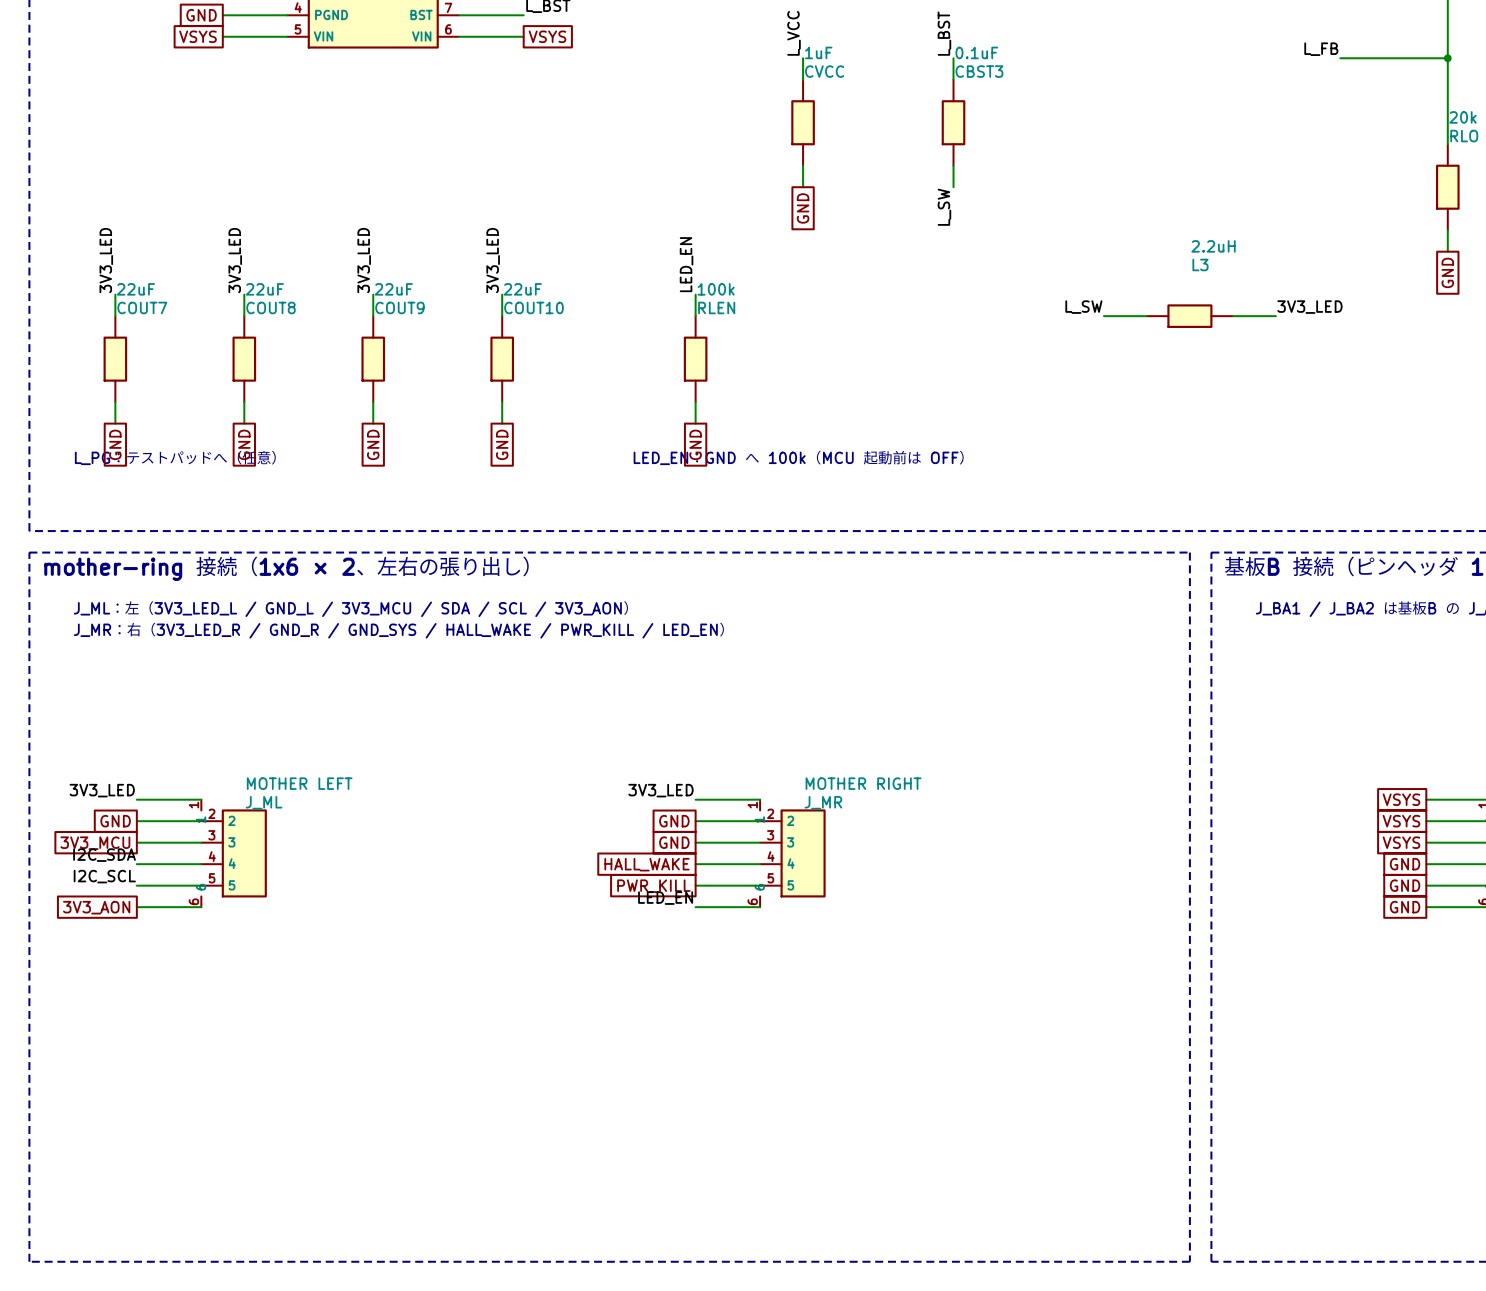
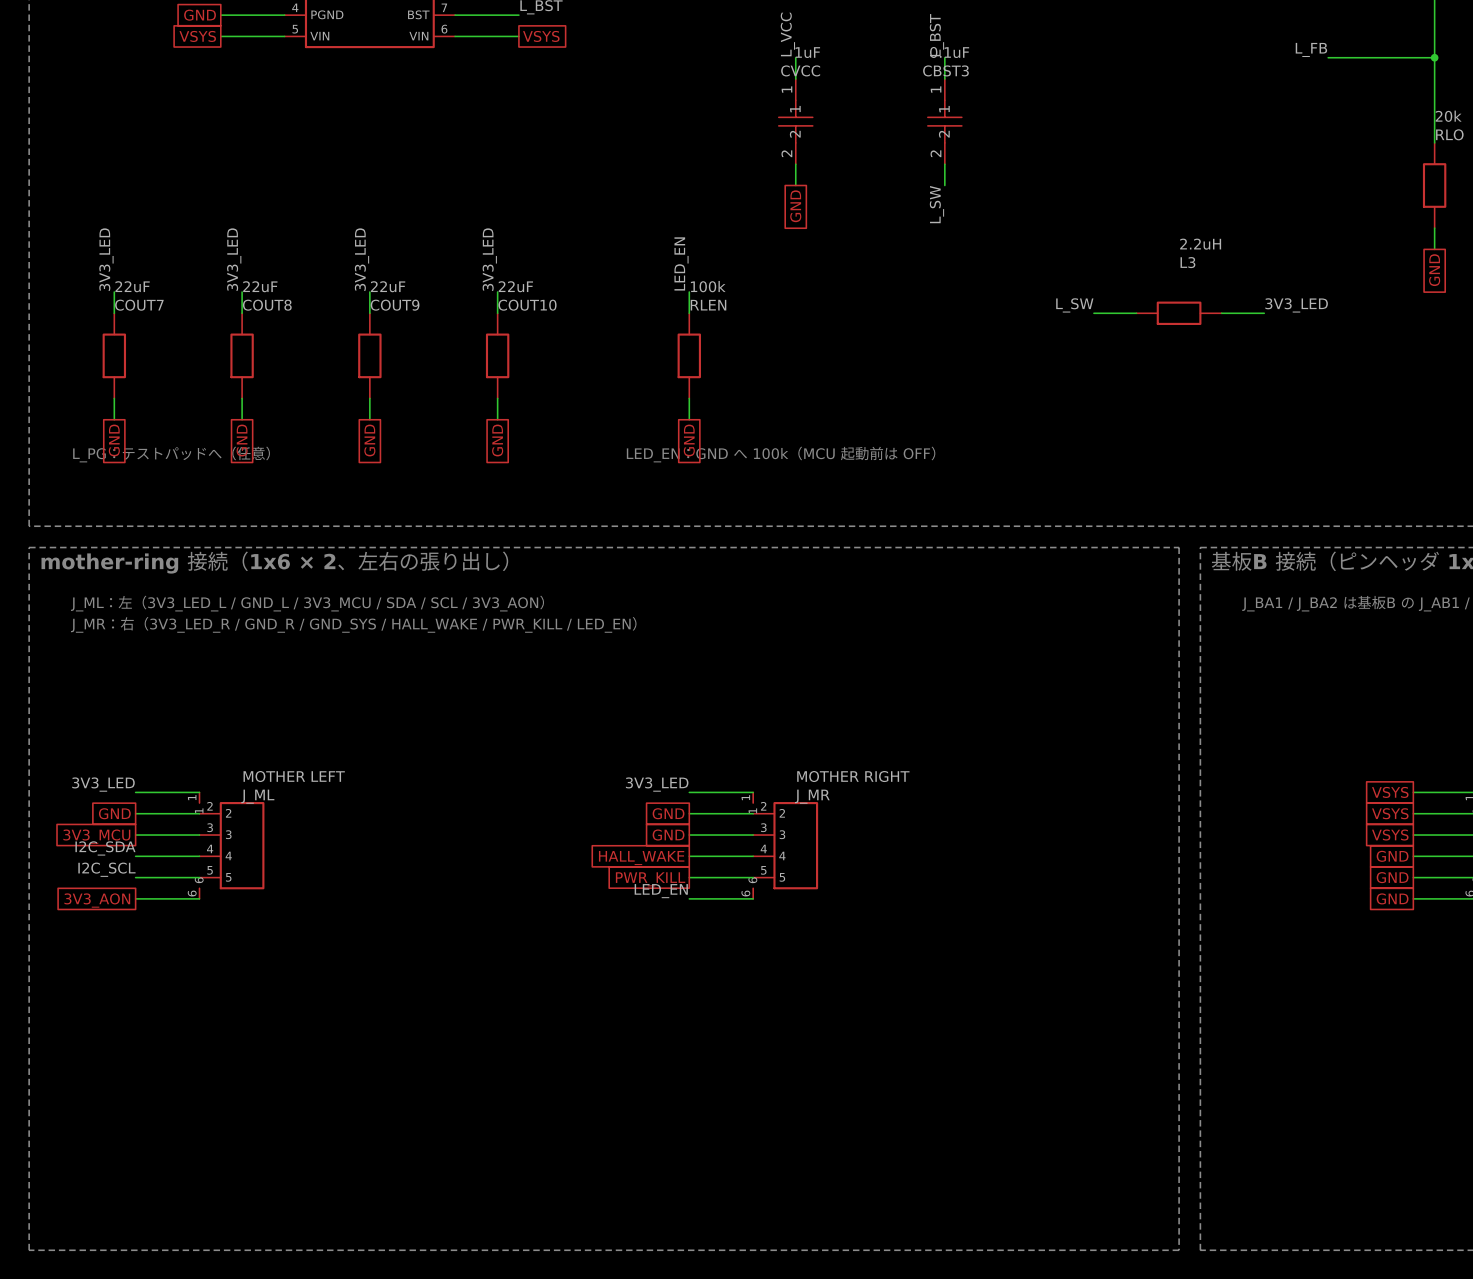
CBST3 value position: 0.1uF (976, 52) -> 0.1uF (949, 52)
CVCC name position: CVCC (824, 71) -> CVCC (800, 70)
CBST3 name position: CBST3 (979, 71) -> CBST3 (945, 70)
CVCC symbol: [791, 79, 815, 166] -> [778, 79, 813, 165]
CBST3 symbol: [941, 79, 966, 166] -> [927, 79, 962, 165]

